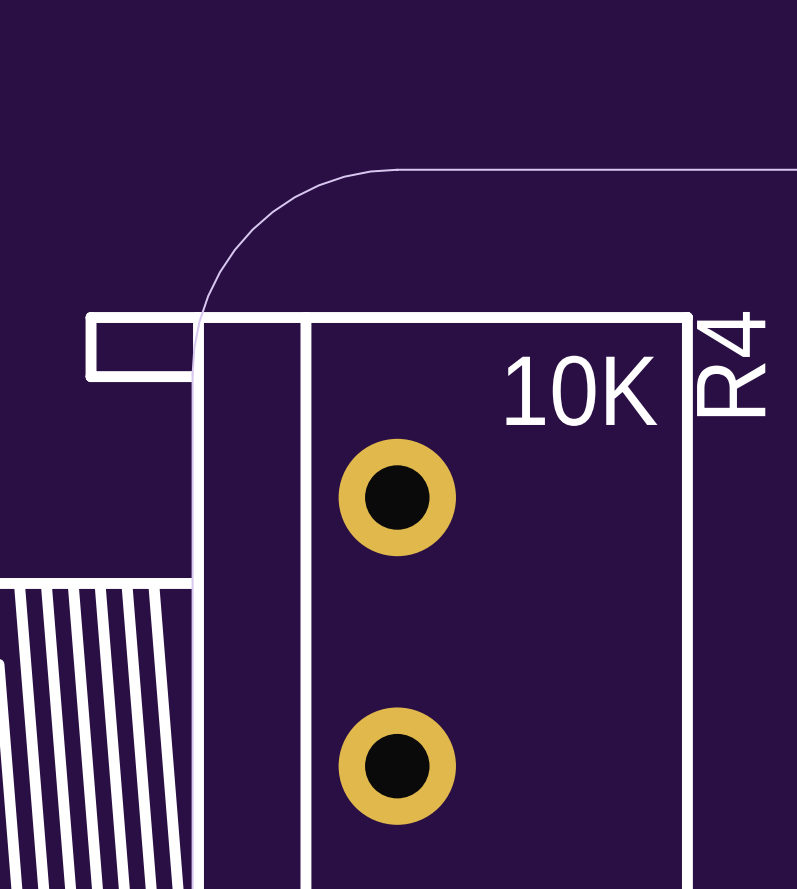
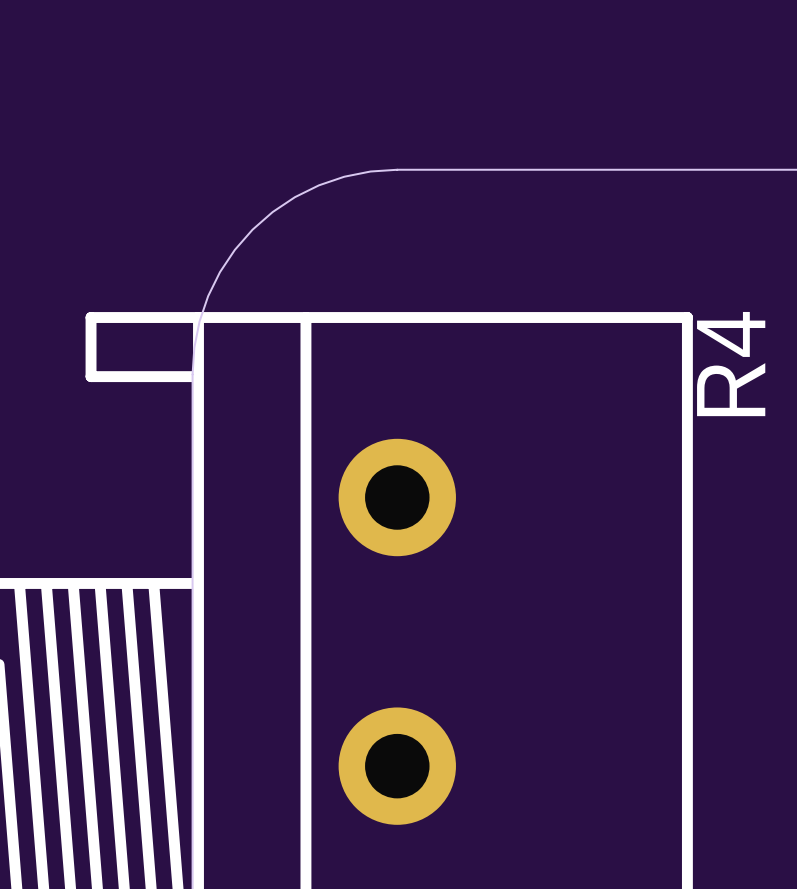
R4 value: 10K (581, 390) -> none

